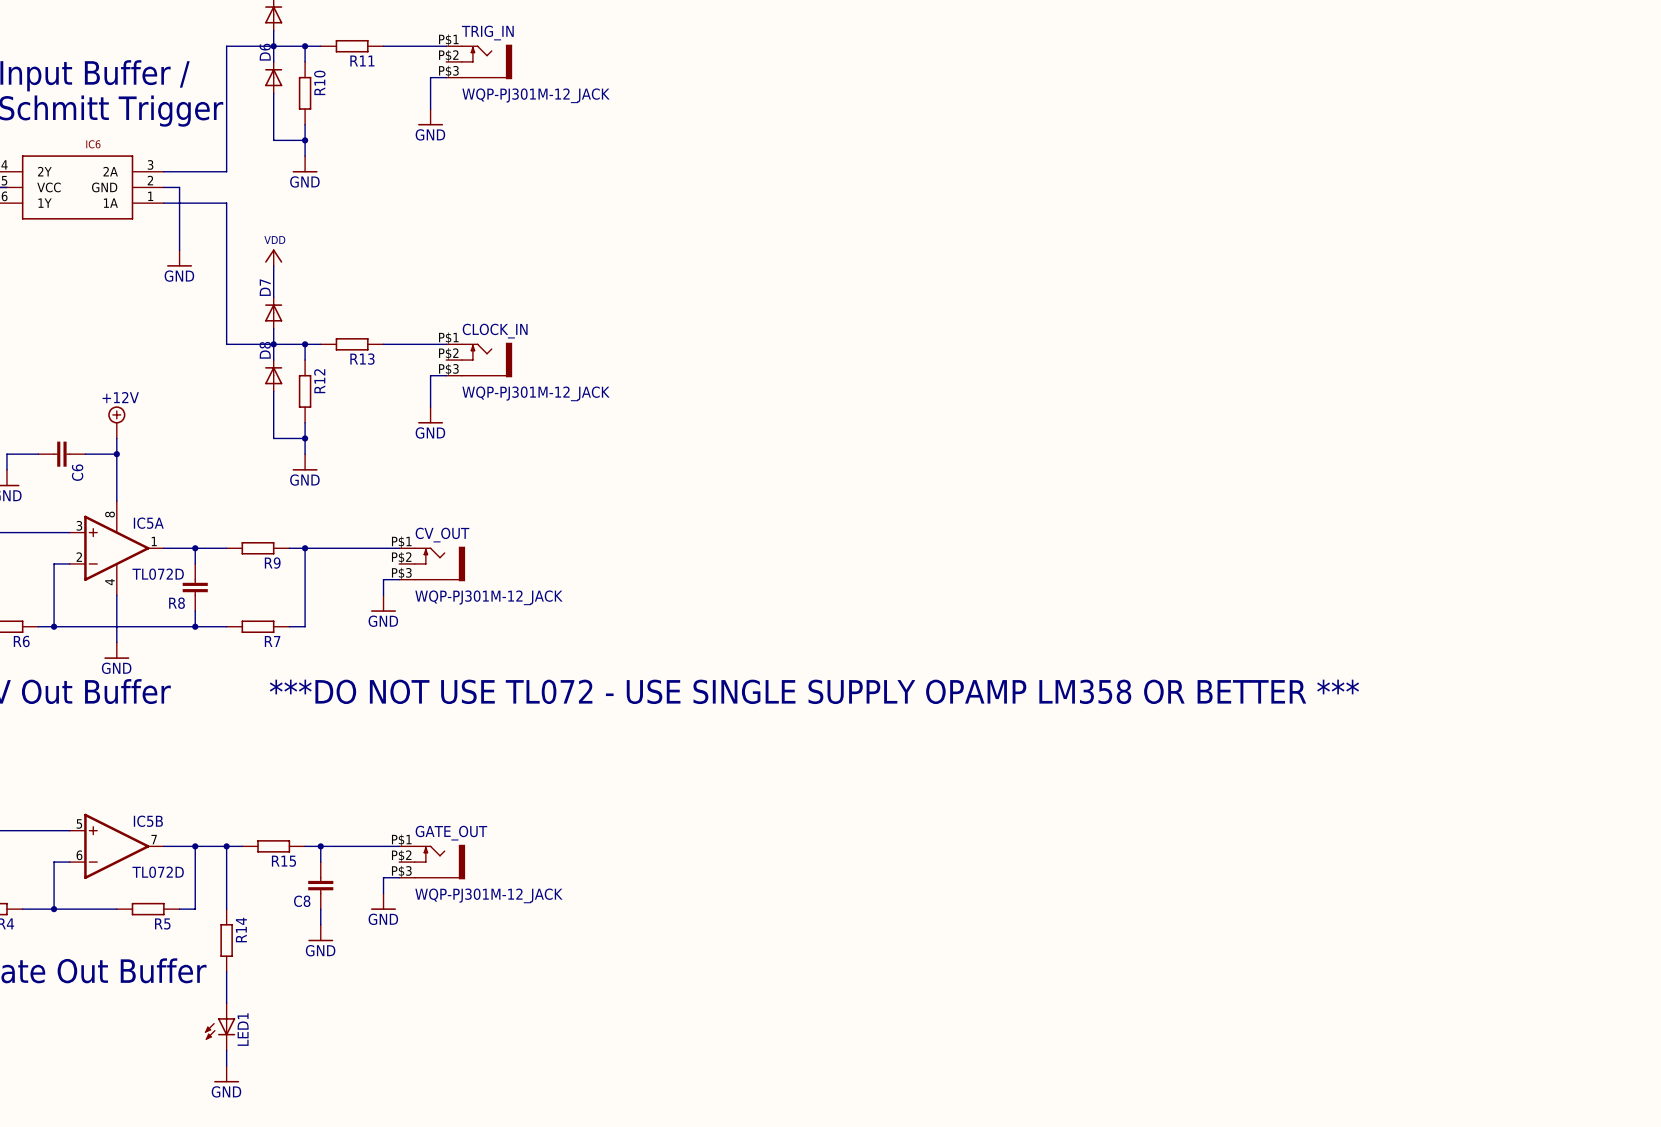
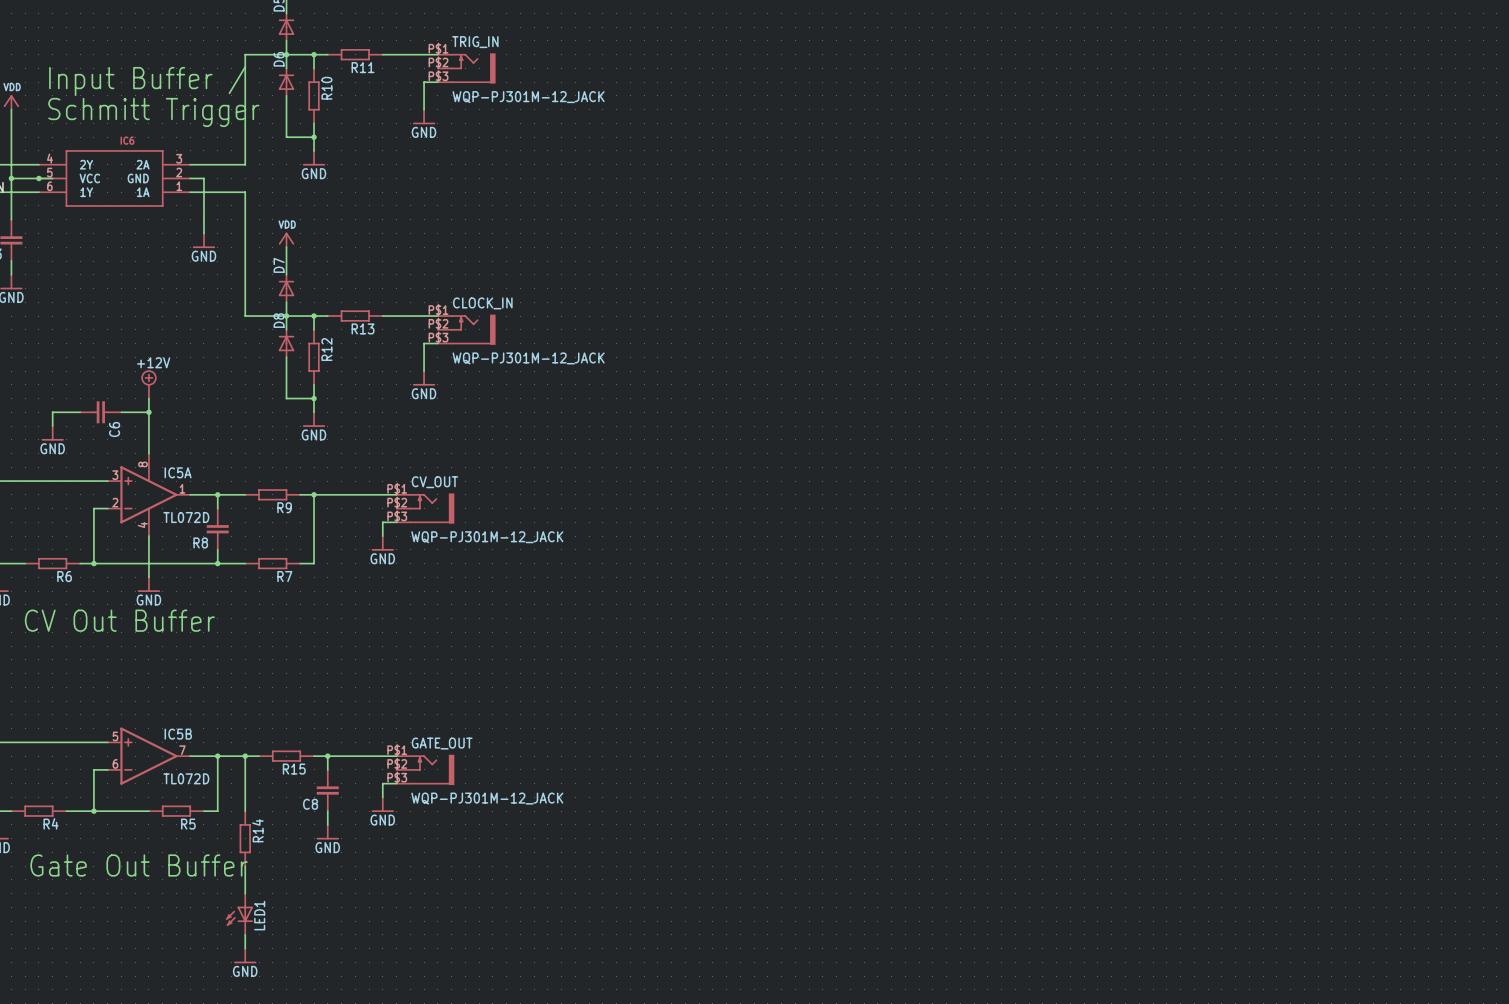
text: ***DO NOT USE TL072 - USE SINGLE SUPPLY OPAMP LM358 OR BETTER *** (814, 691) -> none

